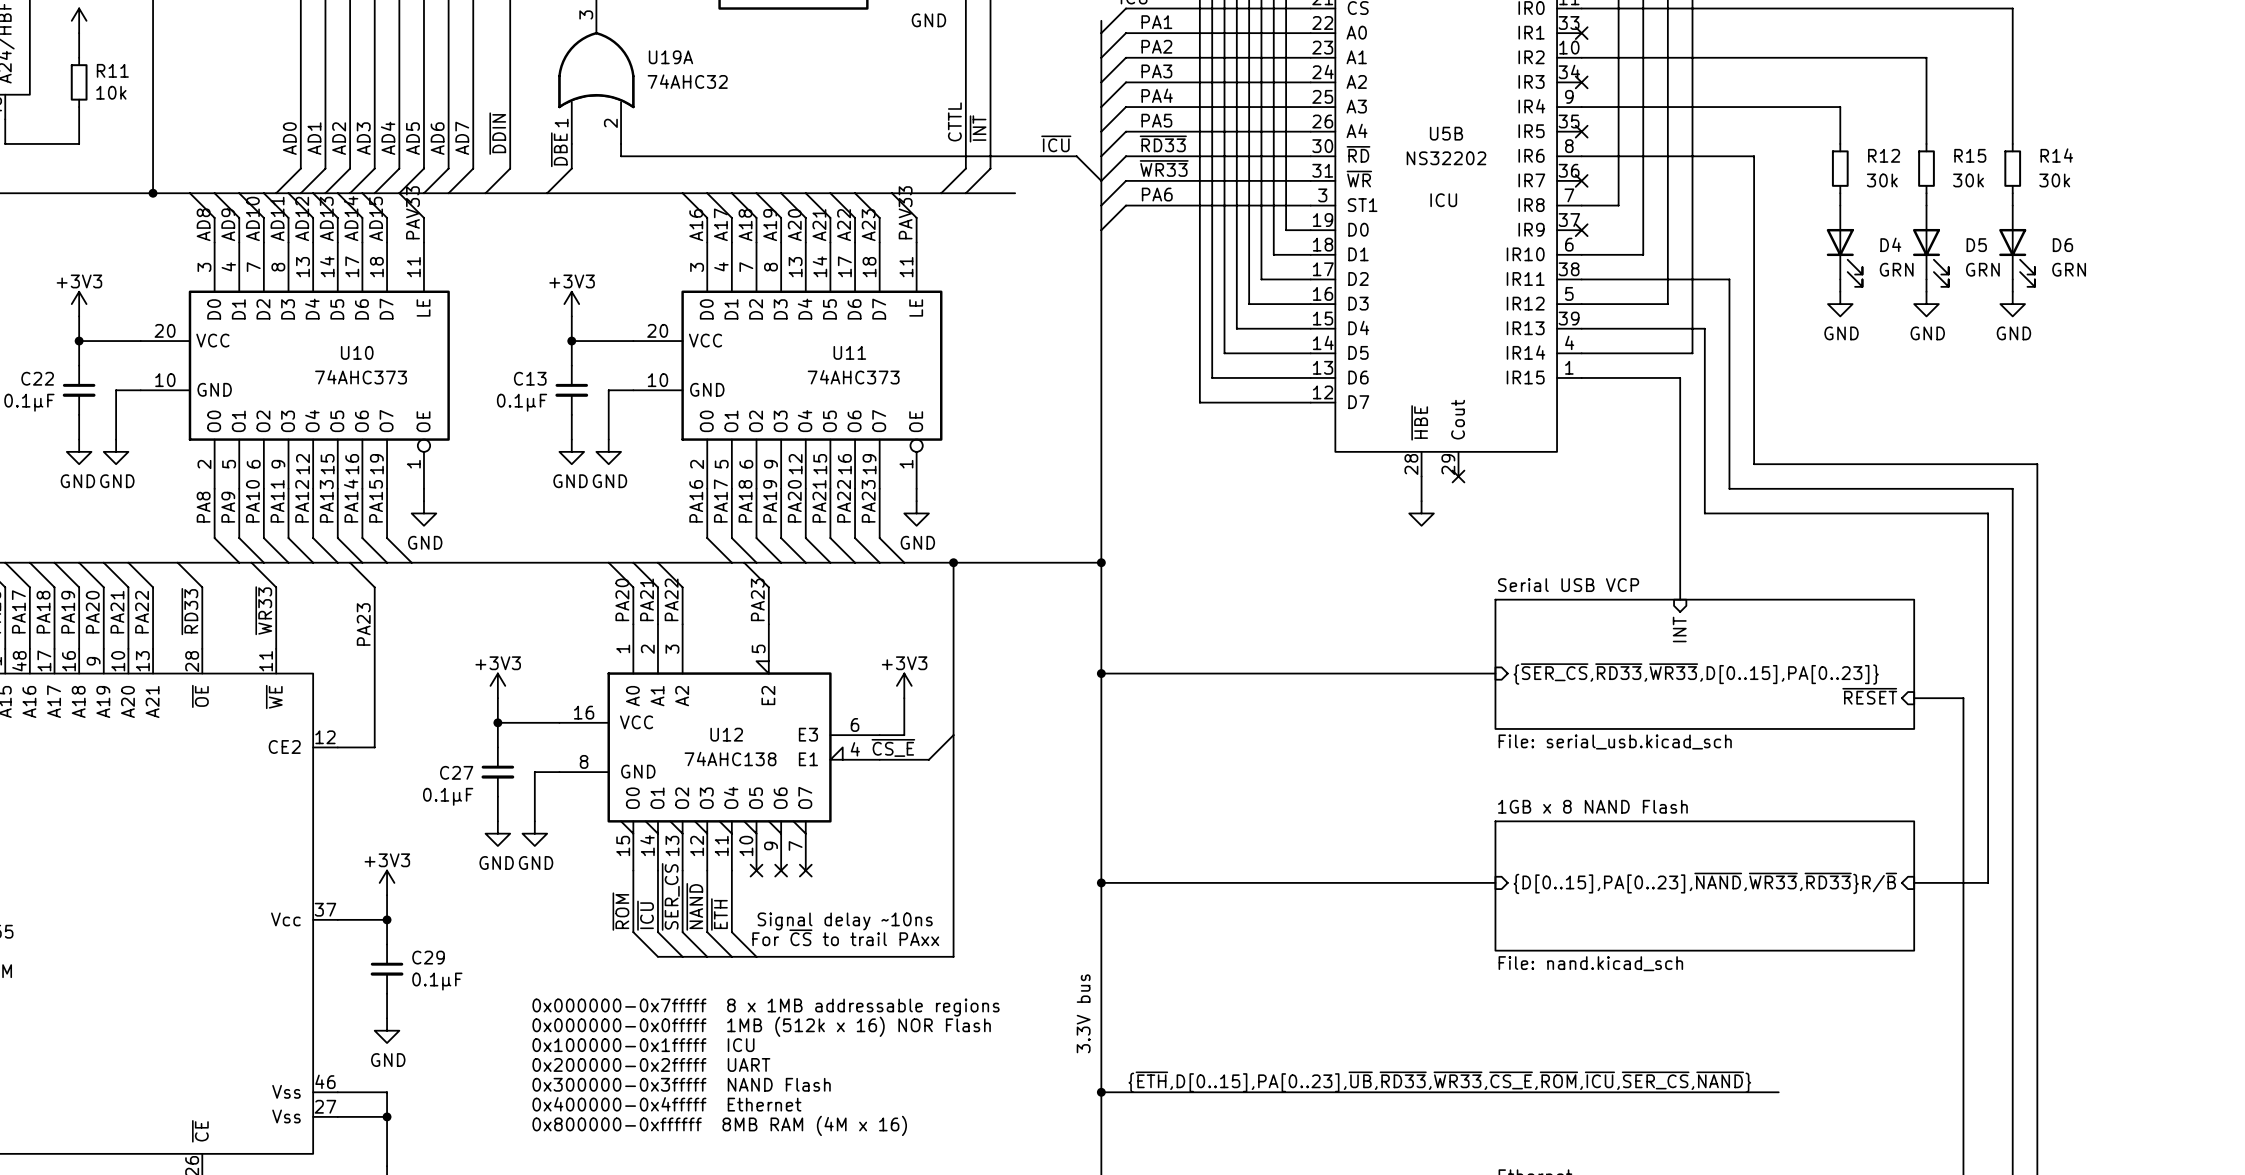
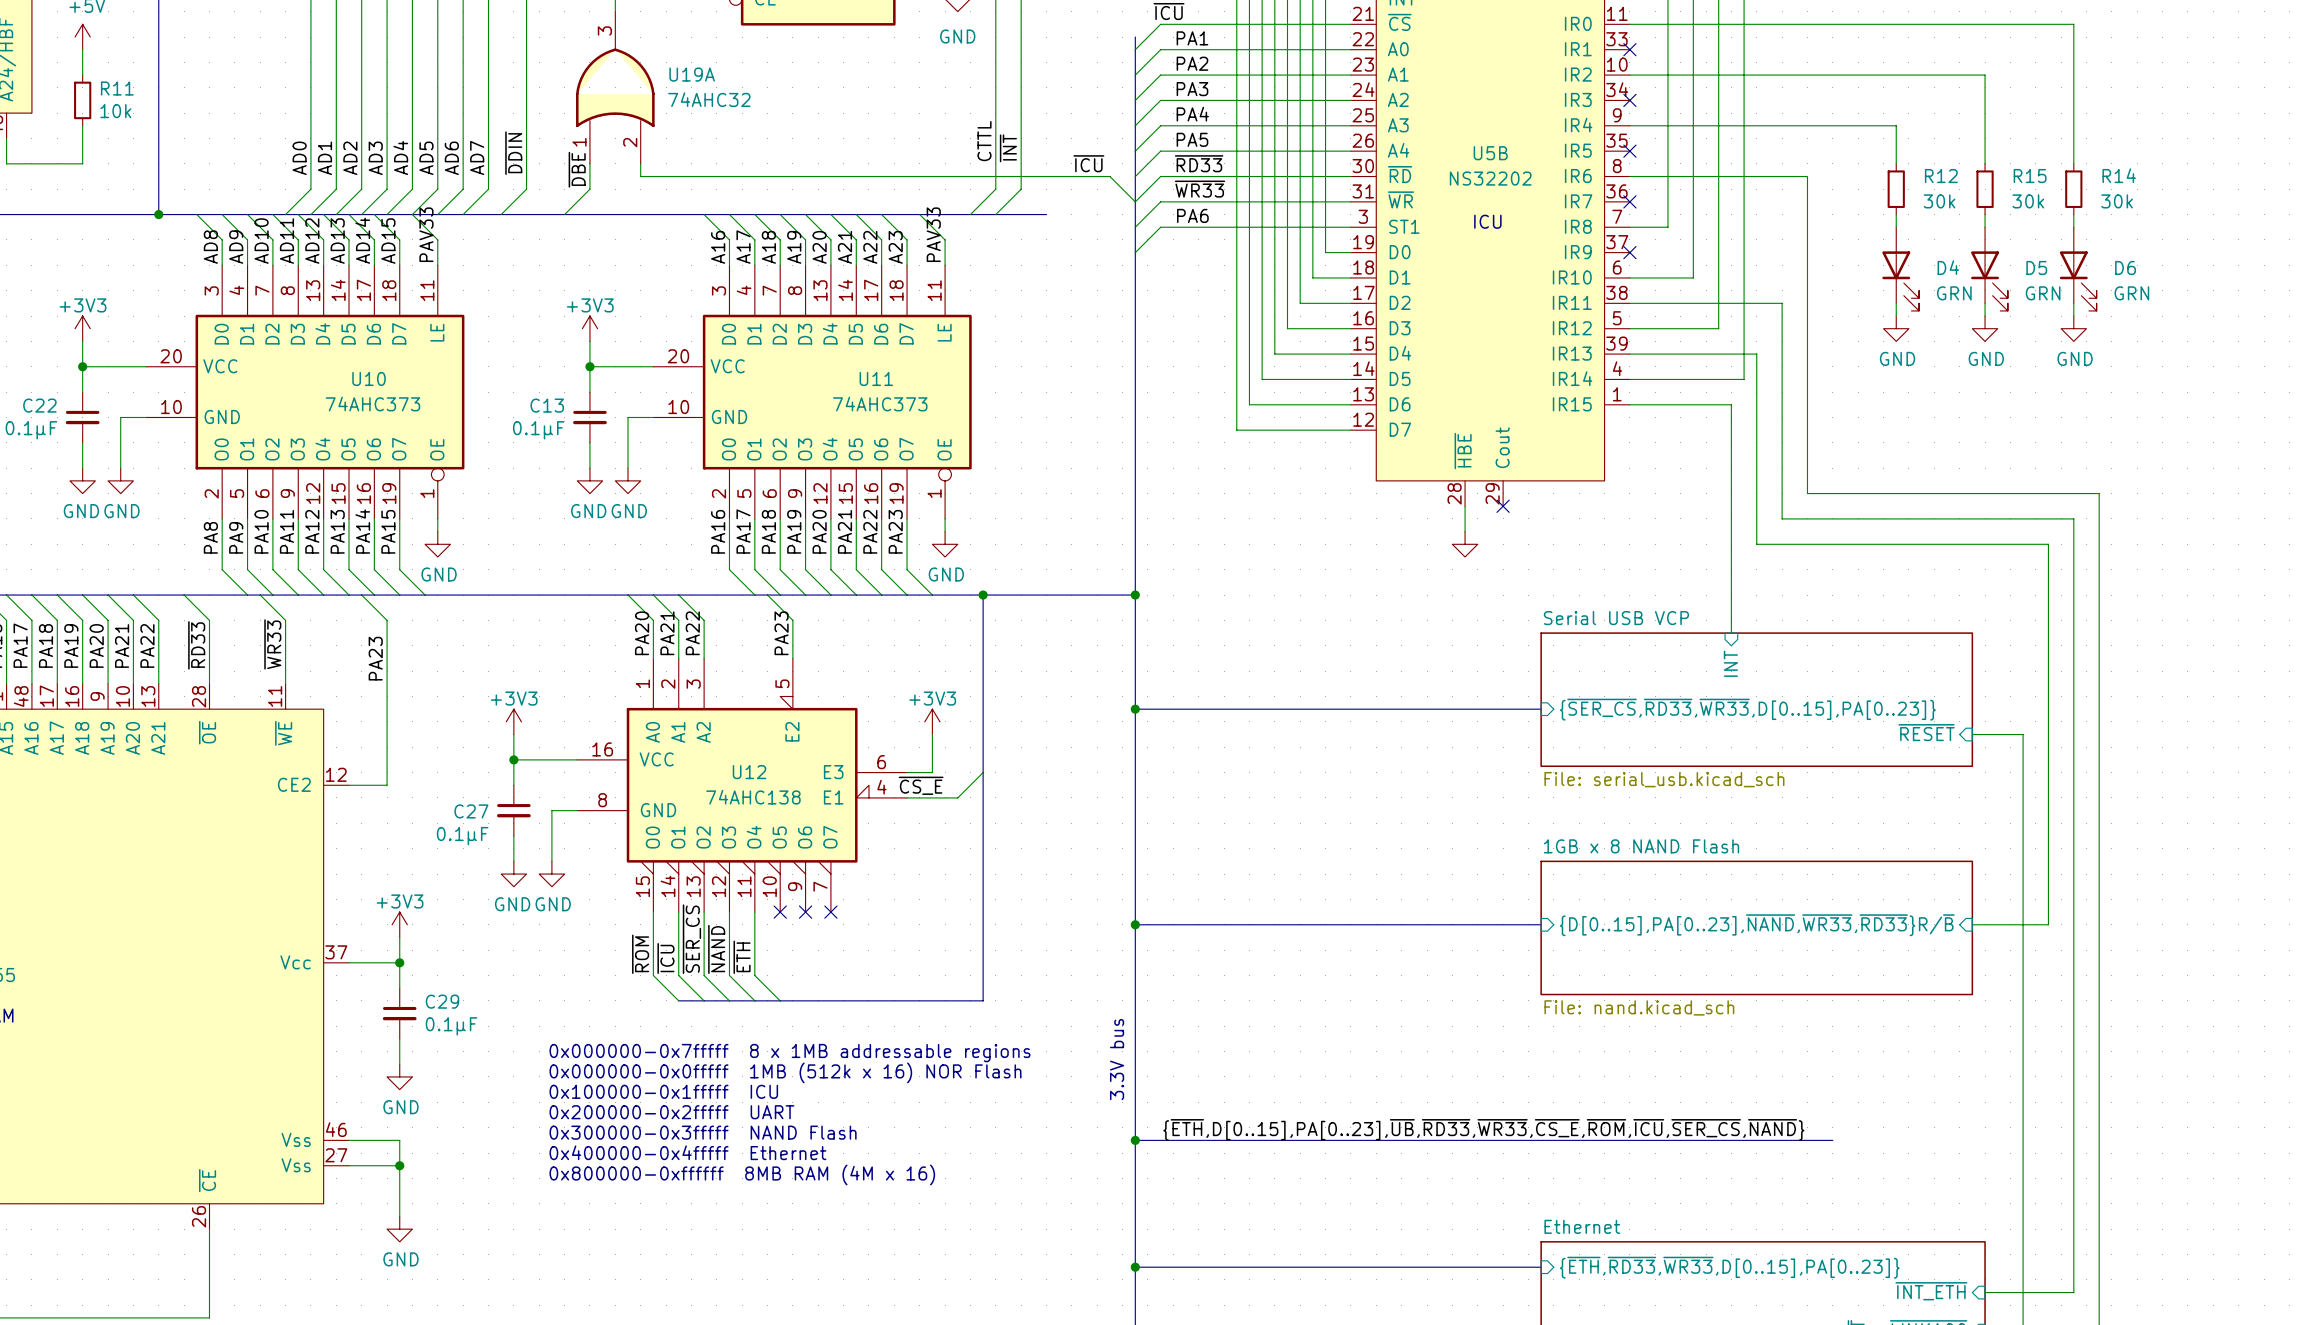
text: Signal delay ~10ns (845, 921) -> none
text: For ~{CS} to trail PAxx (845, 937) -> none

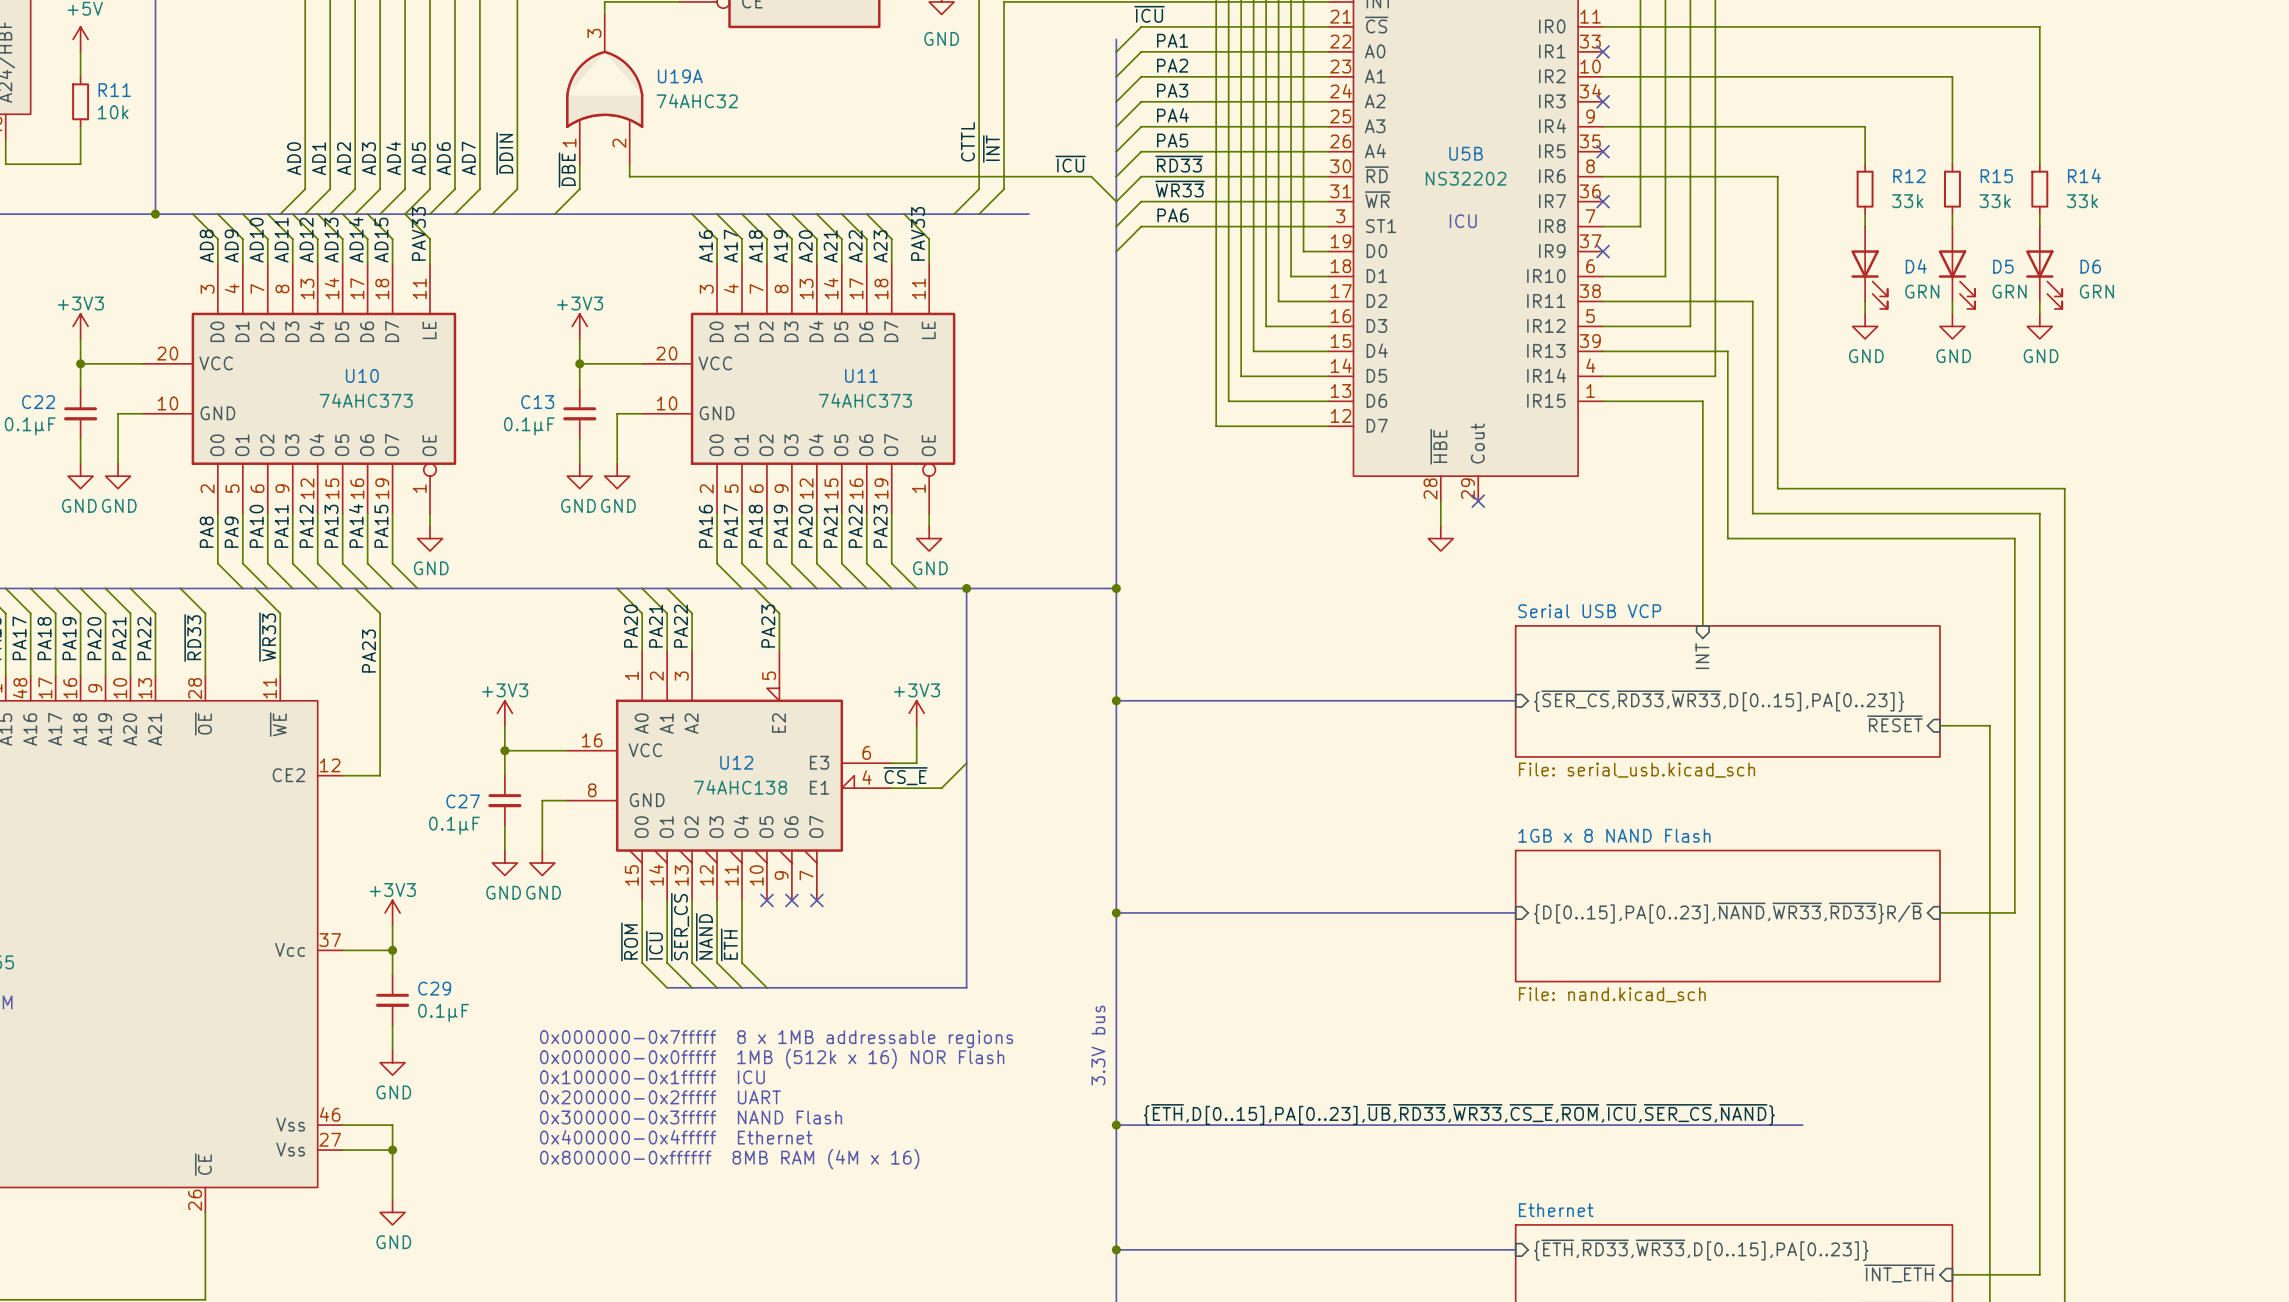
R12 value: 30k (1939, 201) -> 33k (1907, 201)
R15 value: 30k (2028, 201) -> 33k (1995, 201)
R14 value: 30k (2117, 201) -> 33k (2082, 201)

